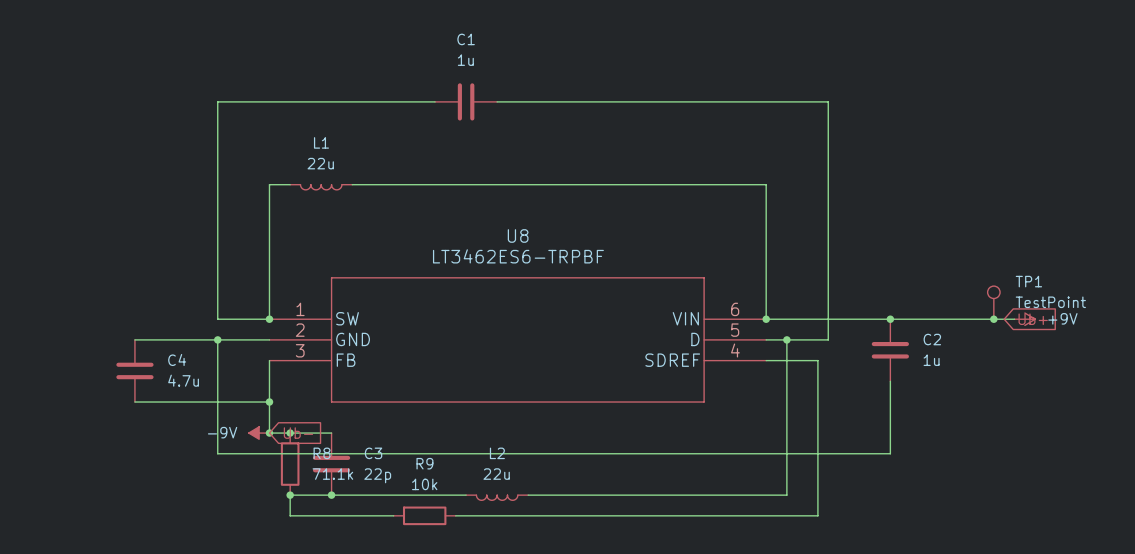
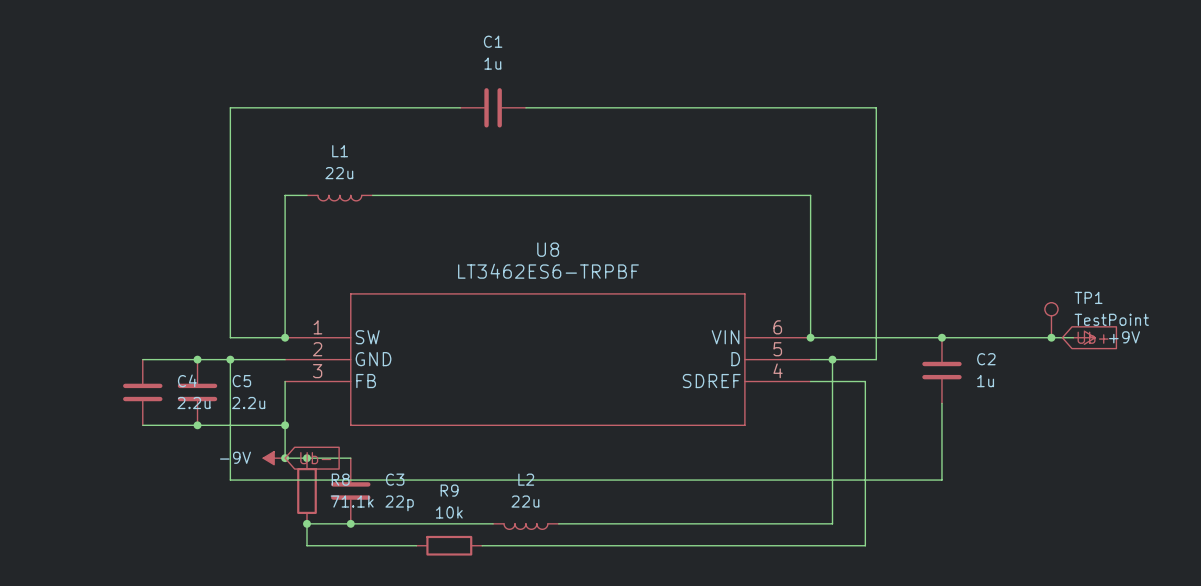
junction: none -> (197, 359)
C5: none -> 2.2u (197, 392)
C4 value: 4.7u (183, 380) -> 2.2u (193, 403)
junction: none -> (197, 425)

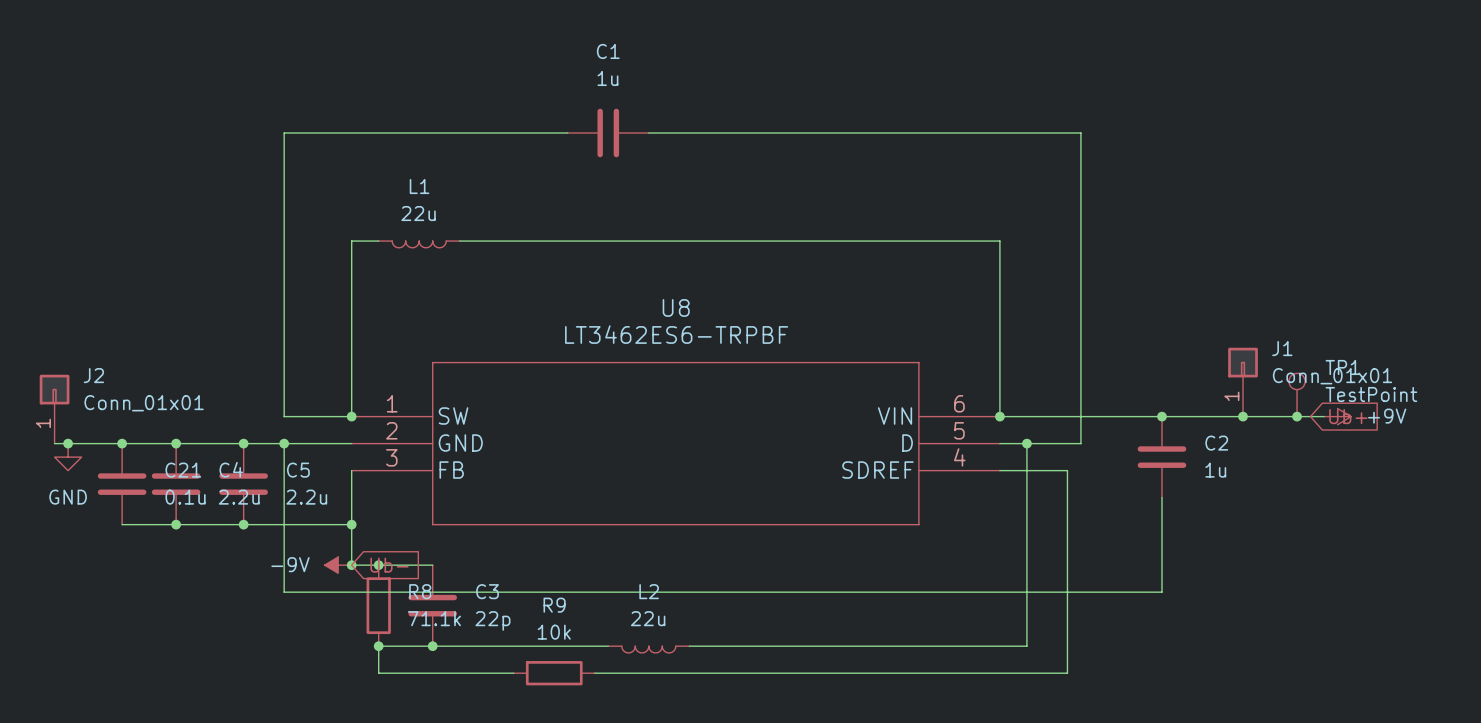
J1: none -> Conn_01x01 (1243, 382)
J2: none -> Conn_01x01 (54, 409)
junction: none -> (1243, 416)
wire: none -> (54, 443) (176, 443)
junction: none -> (68, 443)
junction: none -> (122, 443)
junction: none -> (176, 443)
power symbol: none -> GND (68, 457)
C21: none -> 0.1u (122, 484)
wire: none -> (122, 524) (176, 524)
junction: none -> (176, 524)

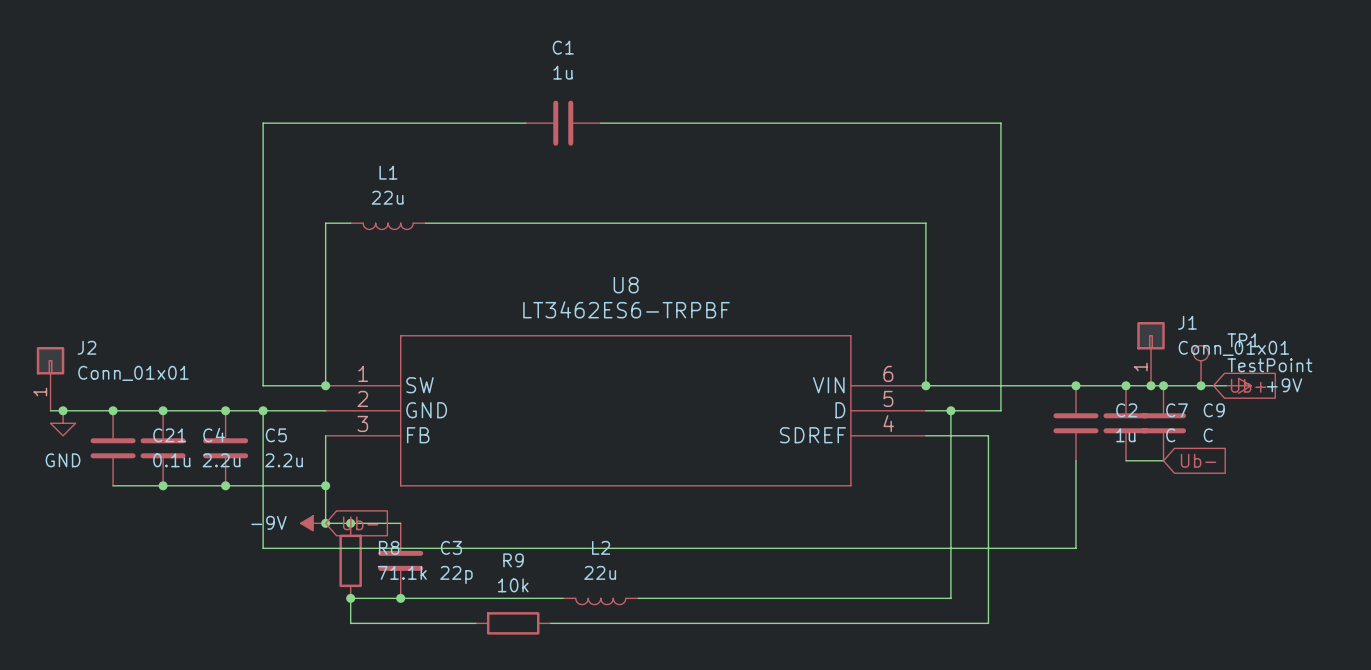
junction: none -> (1126, 385)
junction: none -> (1163, 385)
C7: none -> C (1126, 423)
C9: none -> C (1163, 423)
wire: none -> (1126, 460) (1163, 460)
global label: none -> Ub- (1198, 460)

